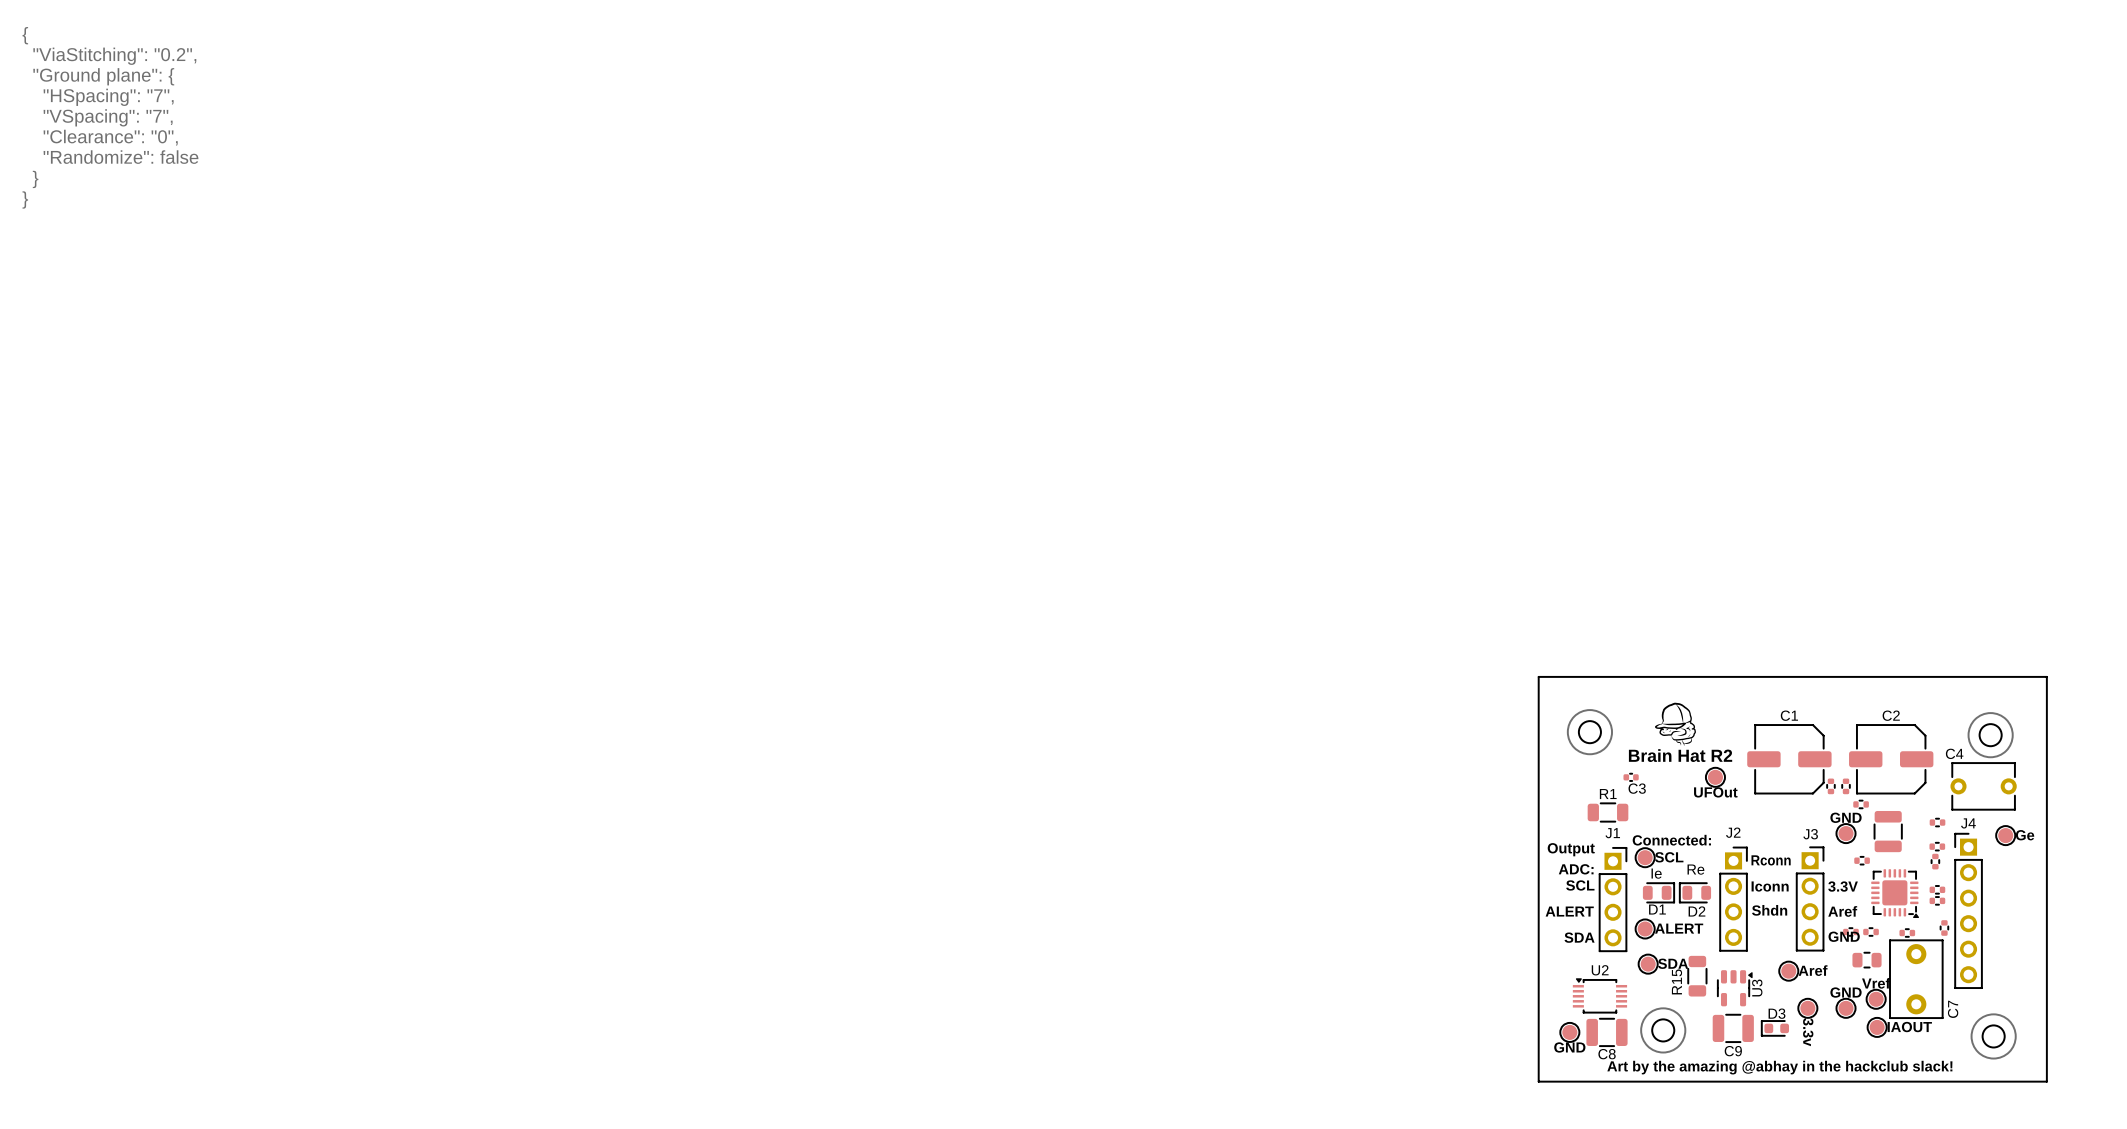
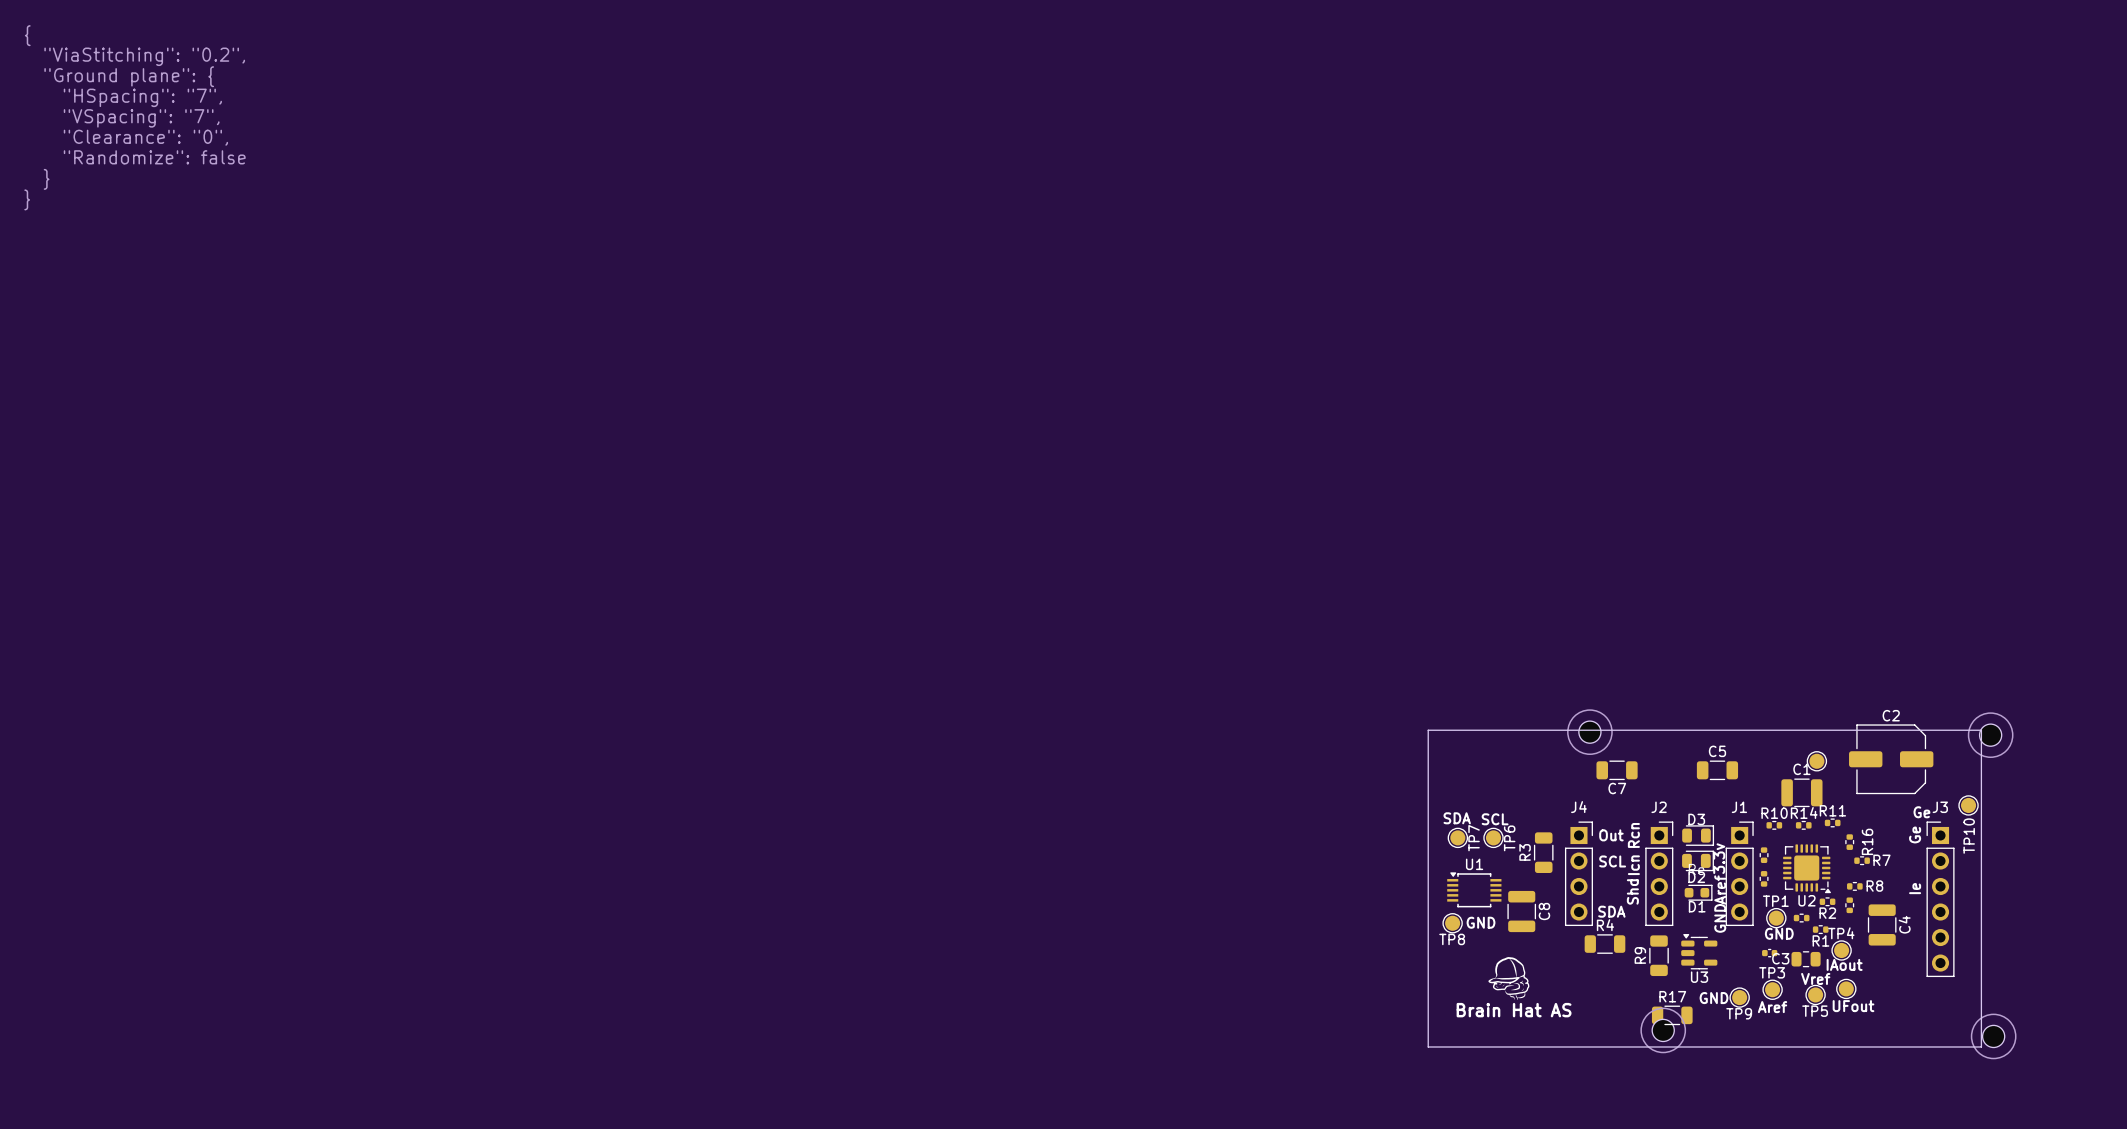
board edge: (1538, 676) (2046, 676) (2046, 1081) (1538, 1081) (1538, 676) -> (1428, 730) (1428, 1046) (1981, 1046) (1981, 730) (1428, 730)
drawing: [1655, 702, 1696, 746] -> none
C1 footprint: [1747, 724, 1832, 795] -> [1781, 778, 1823, 808]
C4 name position: C4 (1954, 753) -> C4 (1904, 924)
text: Brain Hat R2 (1680, 755) -> none
part: none -> (1816, 761)
C4 footprint: [1950, 762, 2017, 811] -> [1867, 904, 1897, 946]
C5: none -> (1717, 770)
C3 footprint: [1623, 773, 1639, 782] -> [1791, 951, 1821, 968]
part: (1715, 777) -> none
part: (1830, 786) -> none
part: (1846, 786) -> none
C3 name position: C3 (1637, 788) -> C3 (1780, 958)
text: UFOut (1715, 792) -> none
R1 name position: R1 (1608, 794) -> R1 (1820, 940)
R1 footprint: [1587, 802, 1629, 823] -> [1812, 925, 1829, 935]
part: (1861, 804) -> none
TP10: none -> (1968, 805)
text: none -> Ge (1921, 812)
text: GND (1846, 817) -> none
text: none -> SDA (1457, 818)
text: none -> SCL (1495, 819)
R11: none -> (1832, 822)
part: (1937, 822) -> none
J4 name position: J4 (1968, 823) -> J4 (1578, 807)
R10: none -> (1774, 825)
R14: none -> (1803, 825)
part: (1888, 831) -> none
part: (1846, 833) -> none
J4 footprint: [1954, 833, 1983, 989] -> [1565, 821, 1593, 926]
J3 name position: J3 (1810, 834) -> J3 (1940, 807)
text: none -> Ge (1915, 834)
part: (2005, 835) -> none
text: Ge (2025, 835) -> none
text: none -> Rcn (1633, 835)
TP7: none -> (1457, 837)
TP6: none -> (1493, 837)
text: Connected: (1671, 840) -> none
R16: none -> (1849, 842)
J3 footprint: [1796, 846, 1825, 952] -> [1926, 821, 1955, 977]
part: (1937, 846) -> none
text: Output (1571, 849) -> Out (1611, 835)
R3: none -> (1543, 852)
part: none -> (1764, 855)
part: (1645, 857) -> none
text: SCL (1669, 857) -> none
text: Rconn (1771, 860) -> none
R7 name: none -> R7 (1881, 860)
part: (1935, 861) -> none
text: none -> Icn (1633, 865)
text: ADC: (1576, 869) -> none
text: Ie (1656, 873) -> none
part: none -> (1764, 878)
D1 footprint: [1642, 882, 1675, 904] -> [1684, 884, 1713, 901]
text position: SCL (1580, 885) -> SCL (1612, 861)
text: Iconn (1770, 886) -> none
text: 3.3V (1843, 886) -> none
R8: none -> (1854, 886)
U1: none -> (1474, 889)
part: (1937, 889) -> none
text: none -> Ie (1915, 888)
text: none -> Aref (1720, 889)
D2 rotation: 0° (1695, 892) -> 180° (1697, 860)
D2 position: (1695, 892) -> (1697, 860)
text: none -> Shd (1632, 891)
part: (1895, 893) -> none
J1 position: (1613, 899) -> (1739, 873)
J2 position: (1733, 899) -> (1659, 873)
part: (1937, 900) -> none
R2: none -> (1827, 901)
part: none -> (1849, 905)
text: Shdn (1769, 910) -> none
text: ALERT (1569, 911) -> none
text: Aref (1842, 911) -> none
text: none -> GND (1720, 918)
TP1: none -> (1776, 918)
part: none -> (1801, 918)
text: none -> GND (1481, 922)
TP8: none -> (1452, 923)
part: (1944, 927) -> none
part: (1645, 928) -> none
text: ALERT (1679, 928) -> none
part: (1850, 932) -> none
part: (1871, 932) -> none
text: none -> GND (1779, 933)
part: (1907, 933) -> none
text: GND (1844, 936) -> none
text position: SDA (1579, 937) -> SDA (1611, 911)
C7 footprint: [1889, 939, 1944, 1019] -> [1596, 760, 1638, 781]
R4: none -> (1604, 944)
TP4: none -> (1841, 950)
part: none -> (1769, 953)
R9: none -> (1659, 955)
drawing: none -> [1488, 957, 1530, 1000]
part: (1867, 960) -> none
text: SDA (1673, 963) -> none
part: (1648, 964) -> none
text: none -> IAout (1844, 964)
U2 name position: U2 (1600, 970) -> U2 (1806, 900)
text: Aref (1813, 970) -> none
part: (1788, 971) -> none
R15: (1697, 976) -> none
U2 footprint: [1572, 978, 1628, 1014] -> [1783, 844, 1831, 894]
text position: Vref (1876, 983) -> Vref (1815, 978)
U3 rotation: 0° (1734, 988) -> 90° counterclockwise (1699, 951)
U3 position: (1734, 988) -> (1699, 951)
U3 name position: U3 (1757, 988) -> U3 (1699, 977)
part: none -> (1846, 988)
TP3: none -> (1772, 989)
text: GND (1846, 992) -> none
TP5: none -> (1815, 994)
TP9: none -> (1739, 997)
text: none -> GND (1714, 998)
part: (1876, 999) -> none
text: none -> Aref (1772, 1007)
text: none -> UFout (1853, 1006)
part: (1807, 1008) -> none
part: (1846, 1008) -> none
text: none -> Brain Hat AS (1514, 1010)
C7 name position: C7 (1953, 1009) -> C7 (1617, 788)
R17: none -> (1672, 1015)
D3 footprint: [1761, 1020, 1790, 1037] -> [1682, 825, 1715, 846]
part: (1877, 1027) -> none
text: IAOUT (1909, 1027) -> none
C9: (1733, 1028) -> none
part: (1569, 1032) -> none
C8 rotation: 0° (1606, 1032) -> 90° clockwise (1521, 911)
C8 position: (1606, 1032) -> (1521, 911)
text rotation: 0° (1808, 1032) -> 180° (1719, 858)
text position: 3.3v (1808, 1032) -> 3.3v (1719, 858)
text: GND (1569, 1047) -> none
C8 name position: C8 (1607, 1054) -> C8 (1544, 911)
text: Art by the amazing @abhay in the hackclub slack! (1779, 1067) -> none

